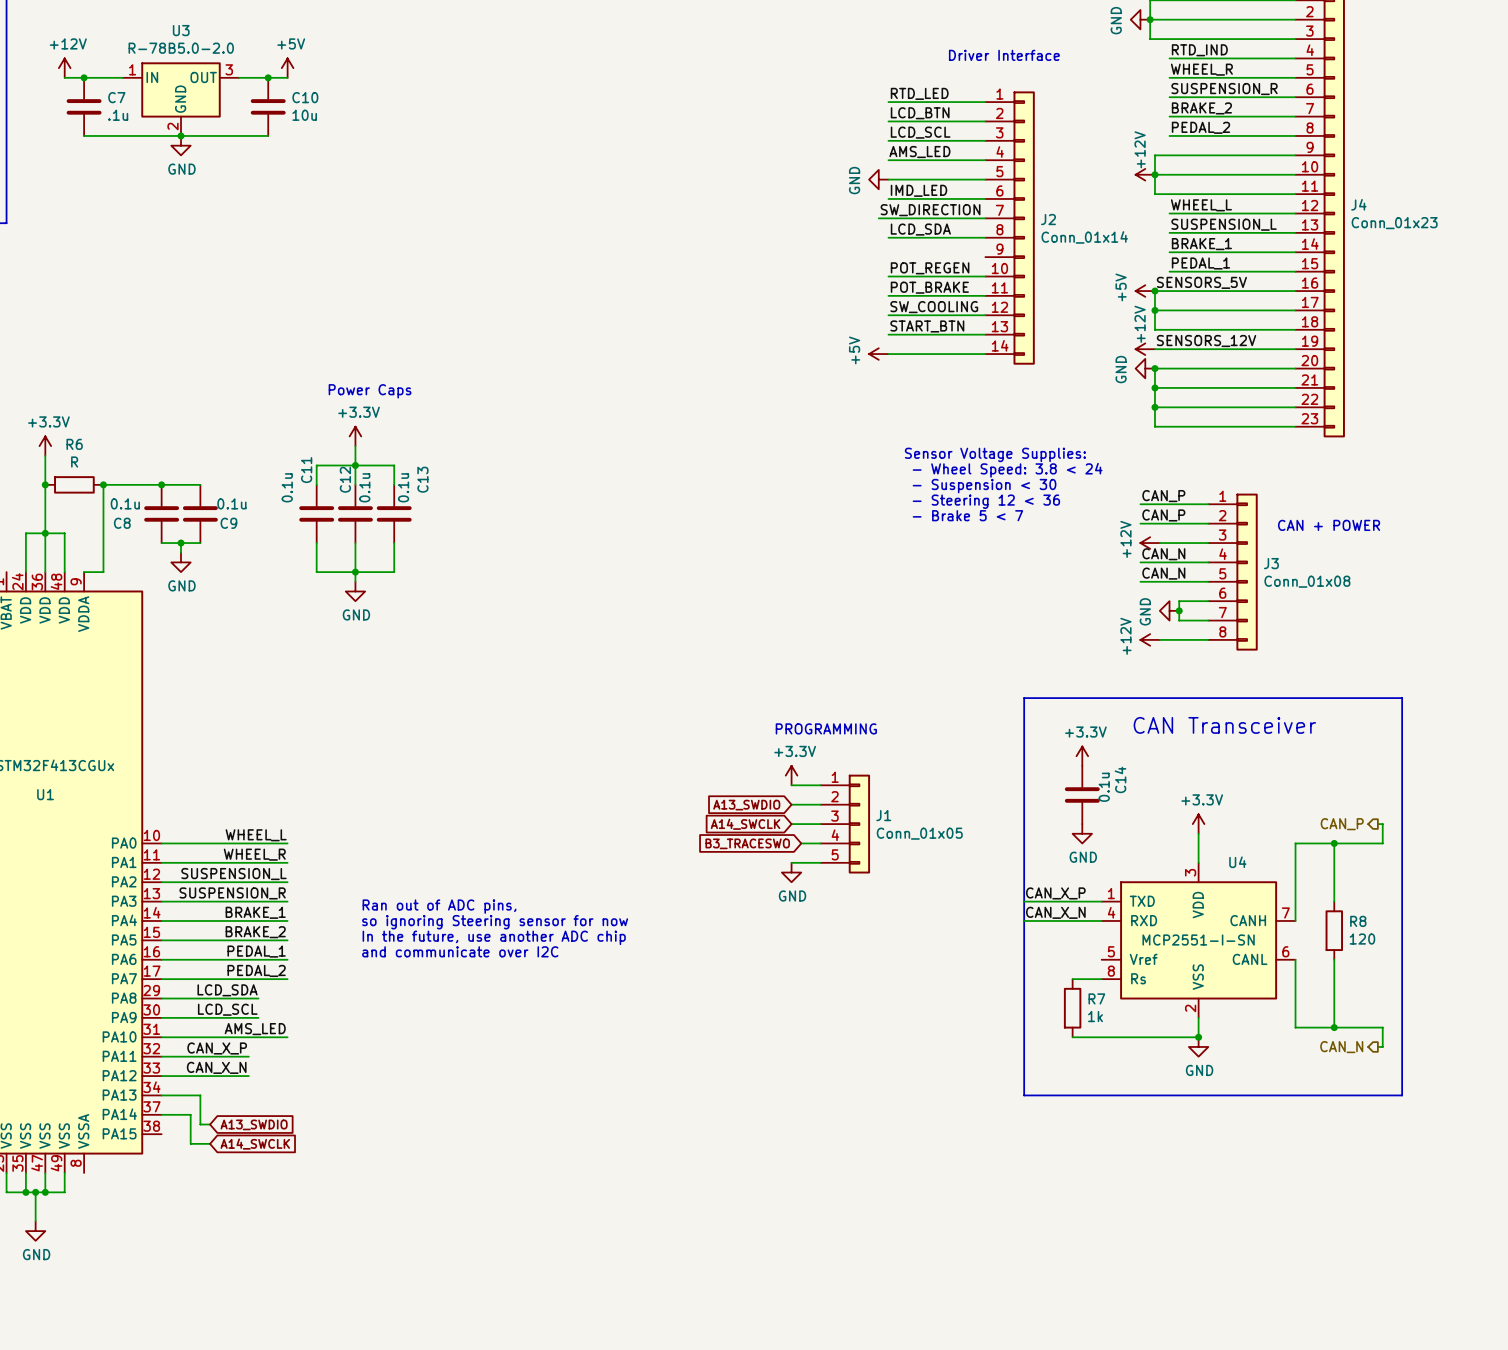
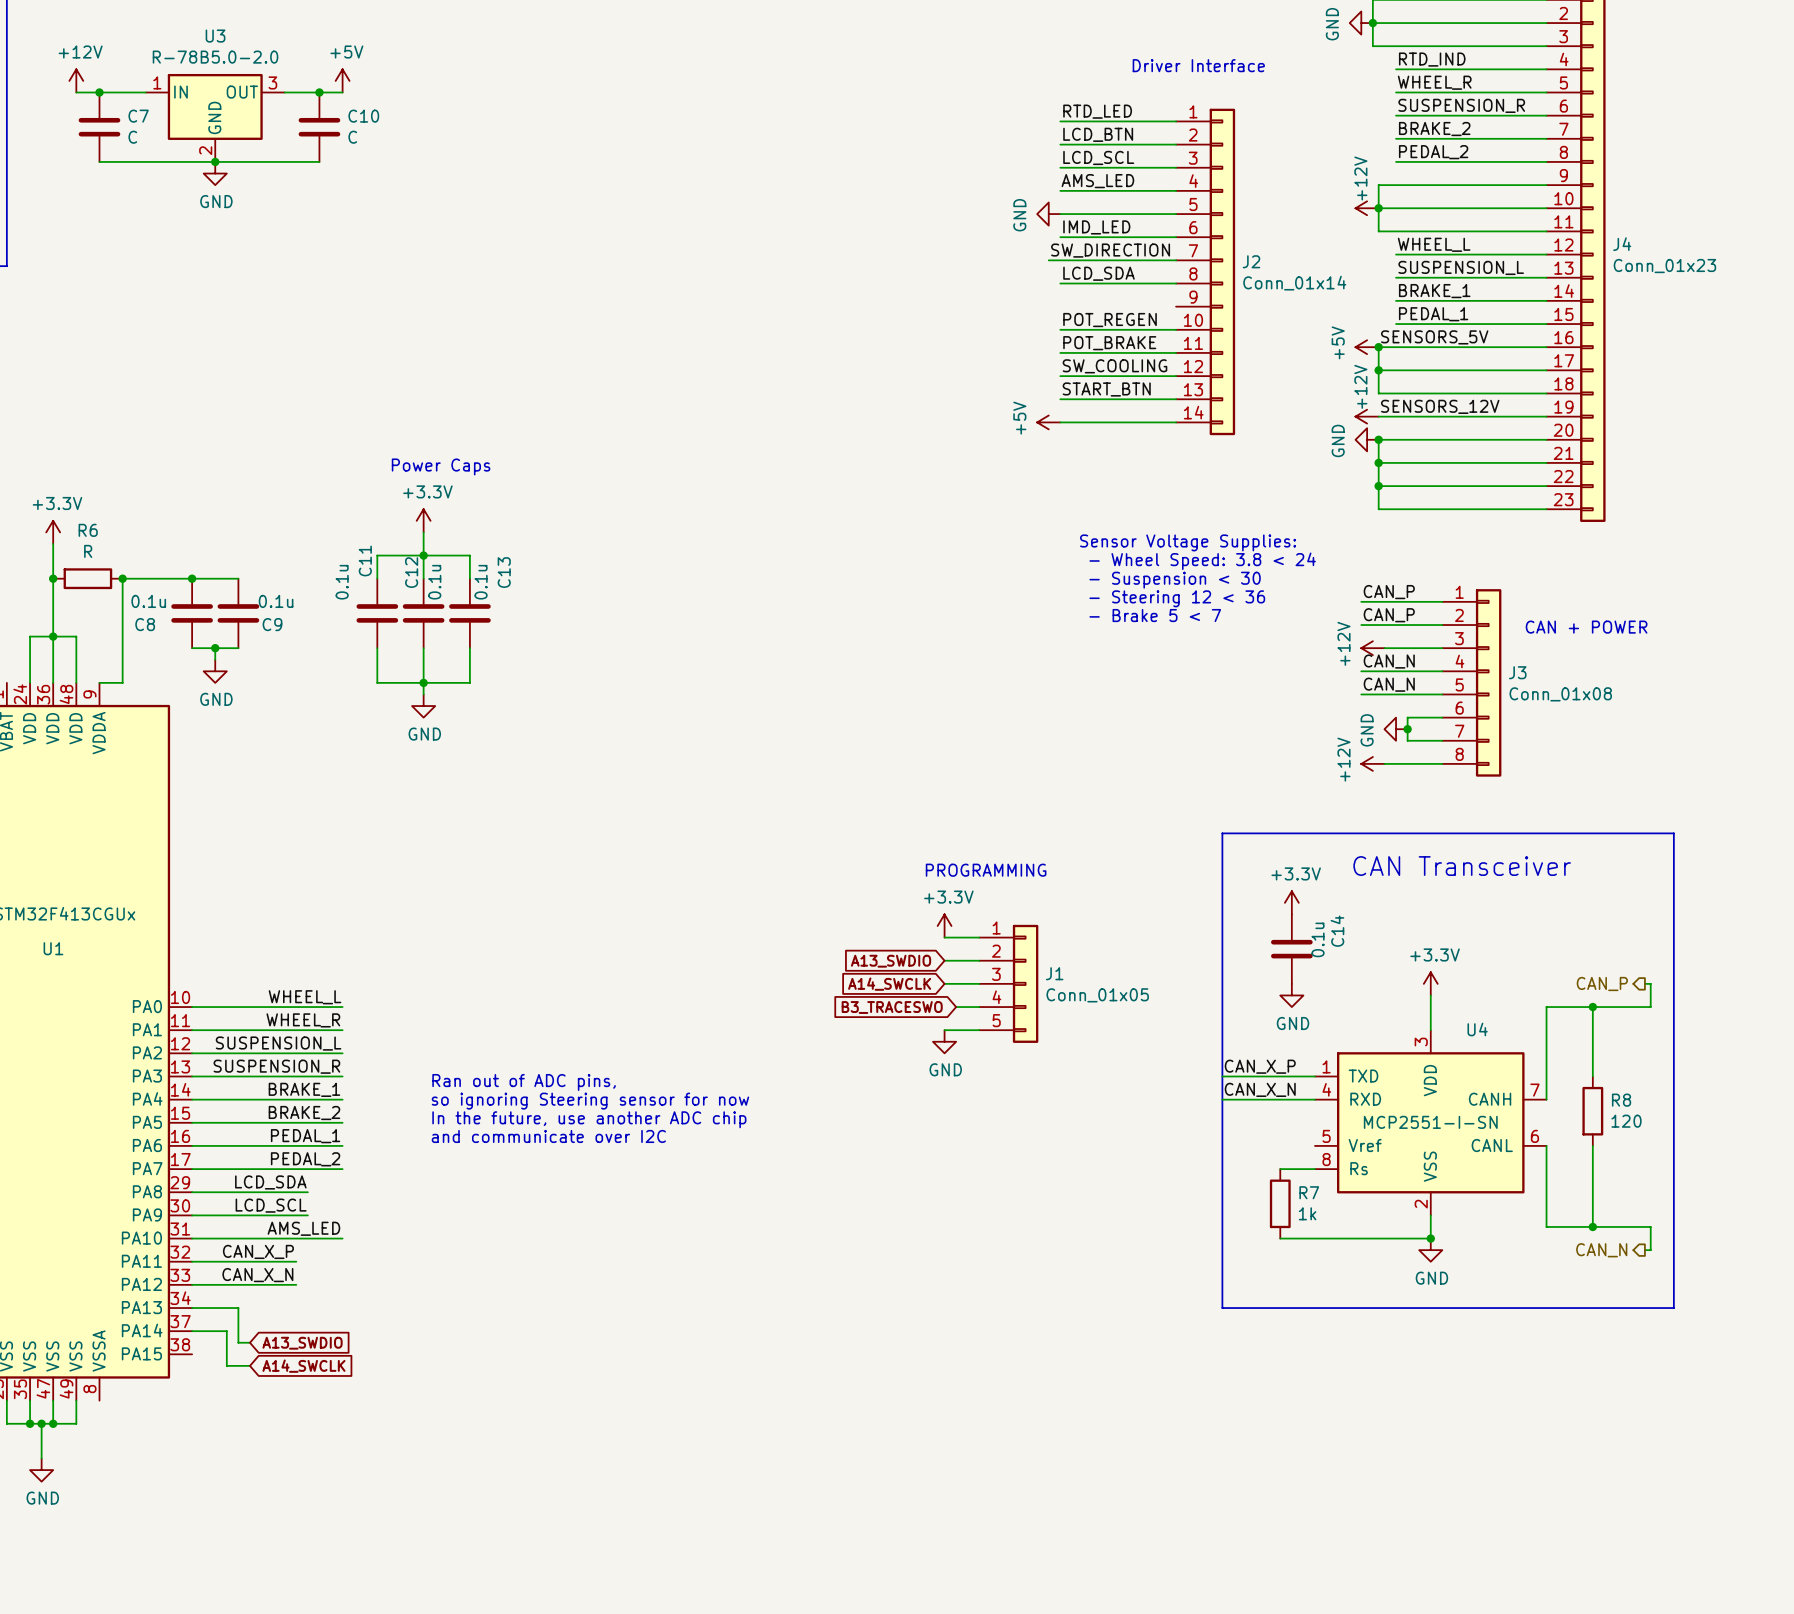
C7 value: .1u (118, 115) -> C (132, 137)
C10 value: 10u (304, 115) -> C (352, 137)

